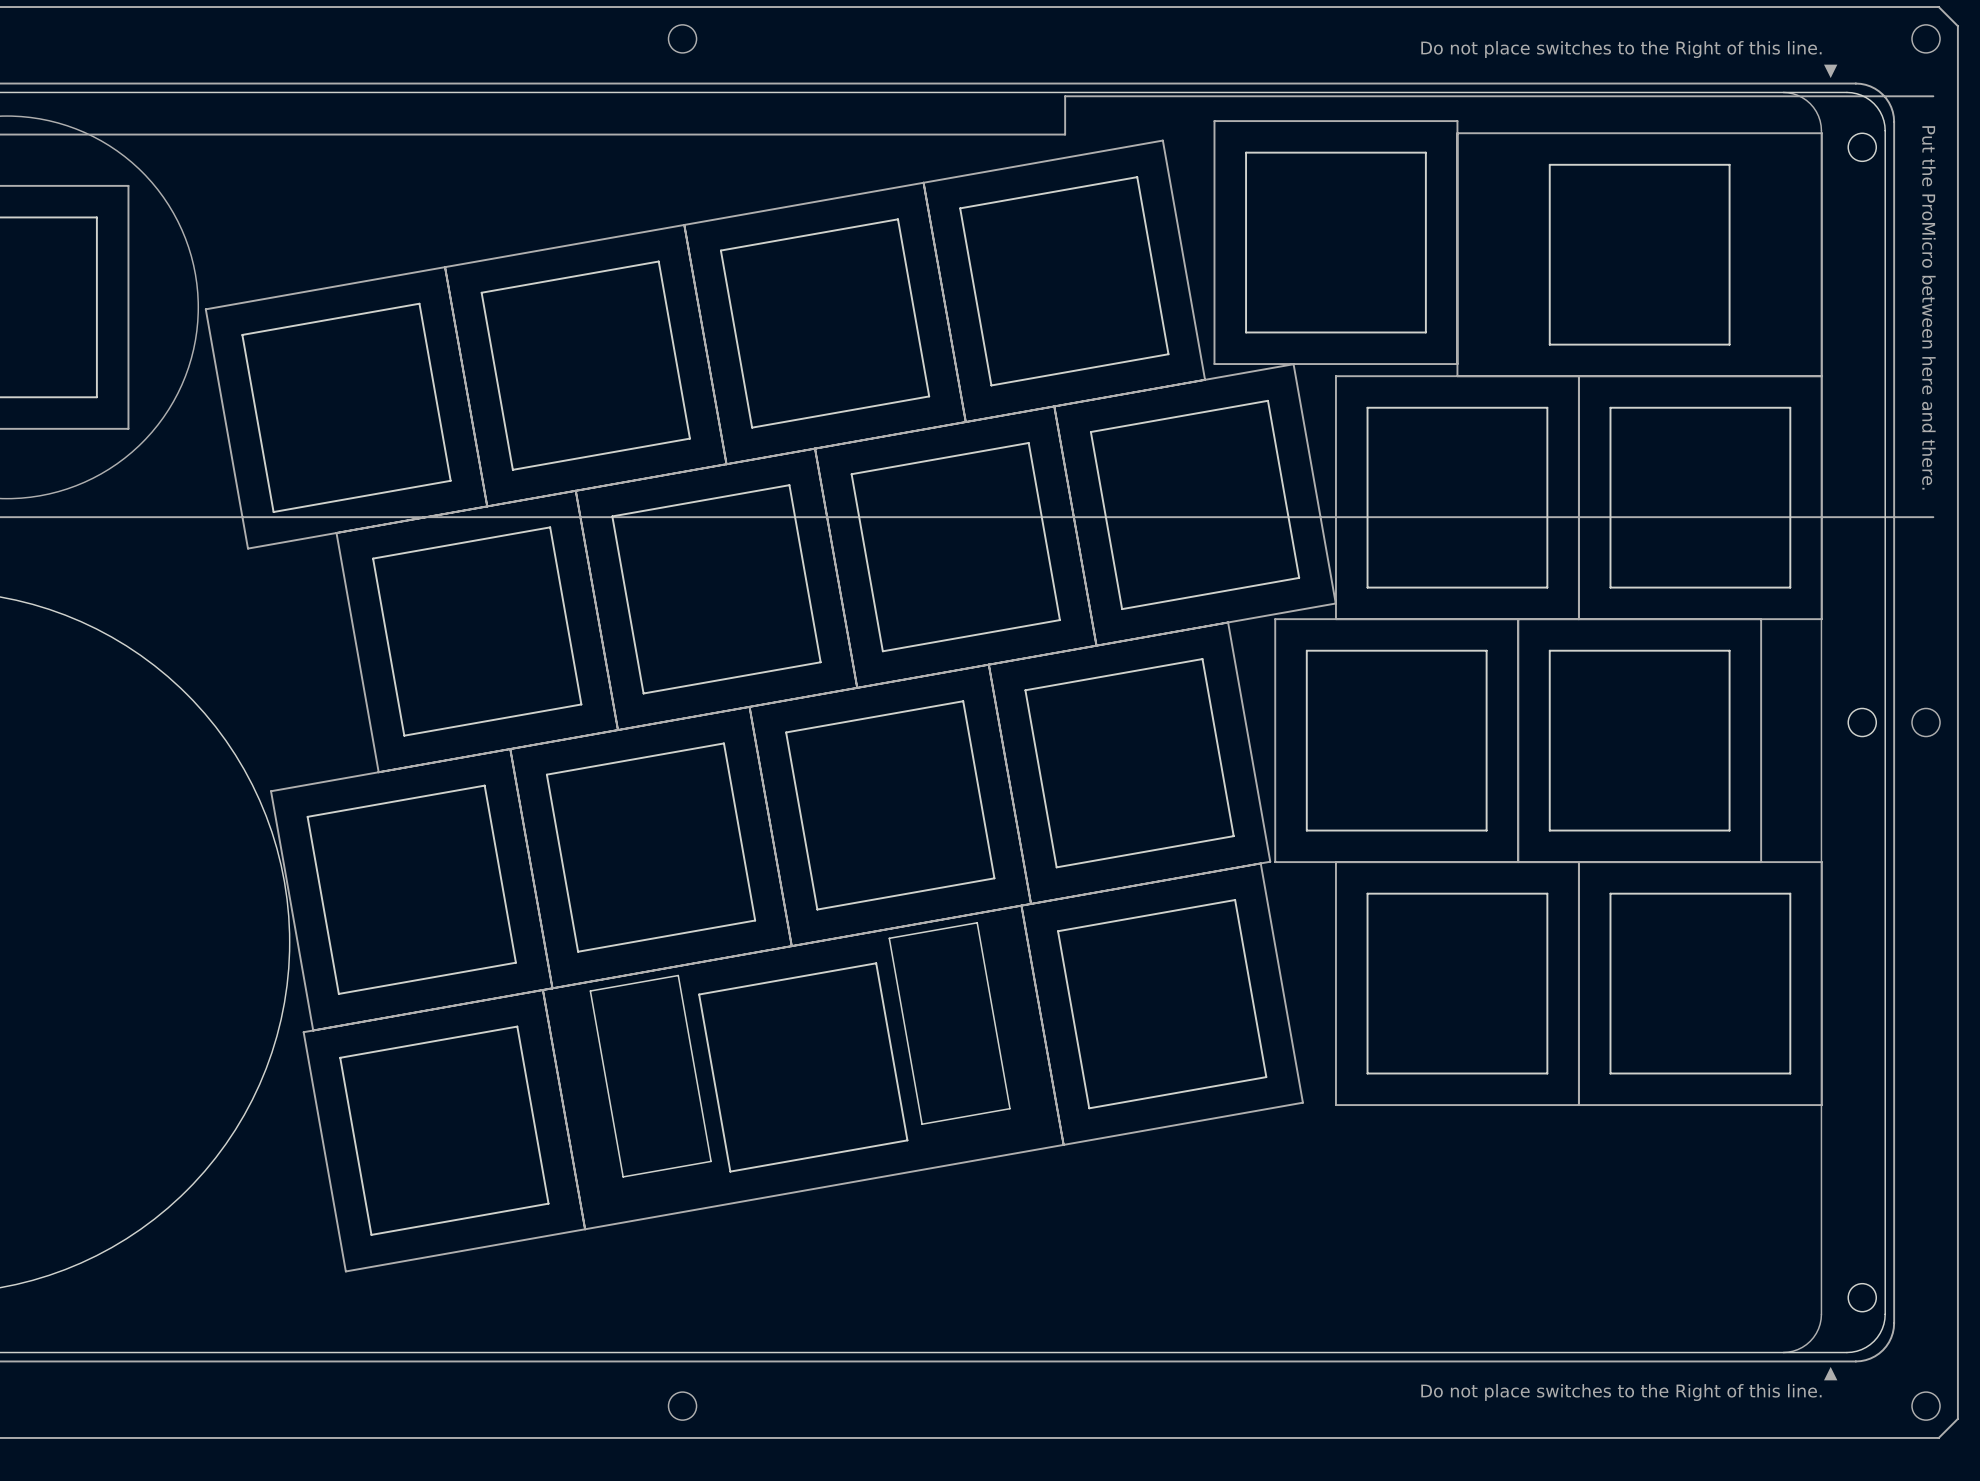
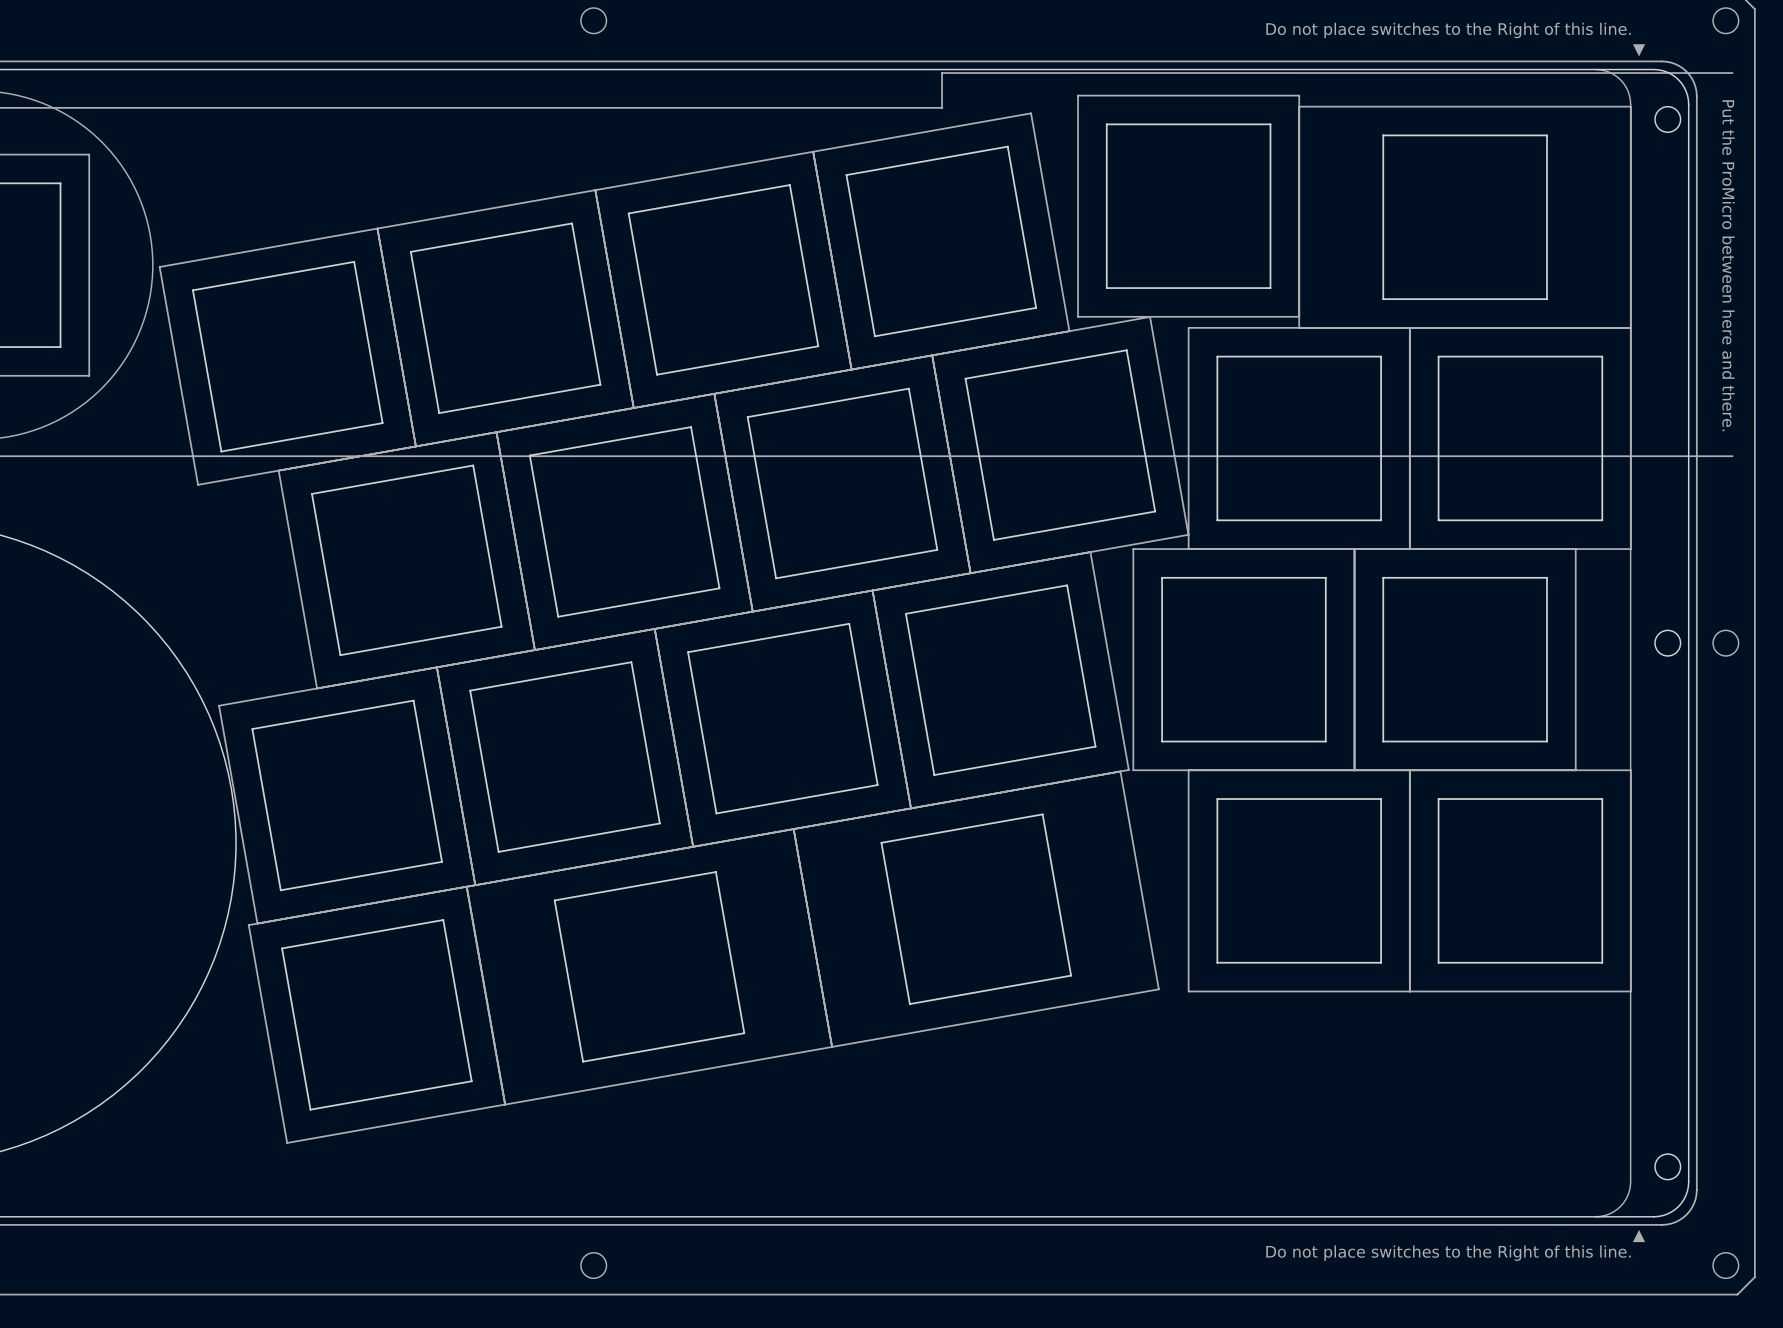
drawing: [541, 862, 1304, 1231] -> none
drawing: none -> [466, 770, 1160, 1106]

